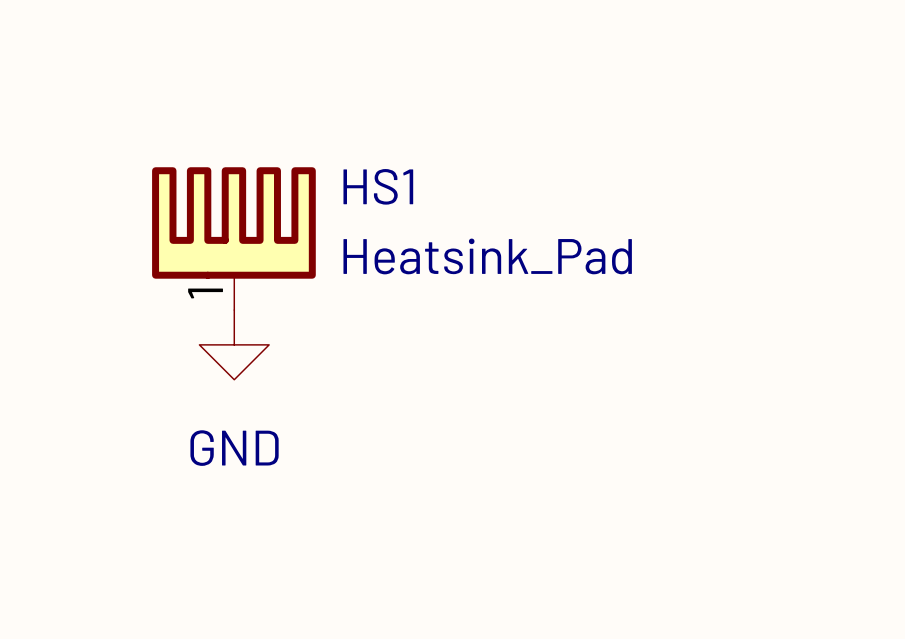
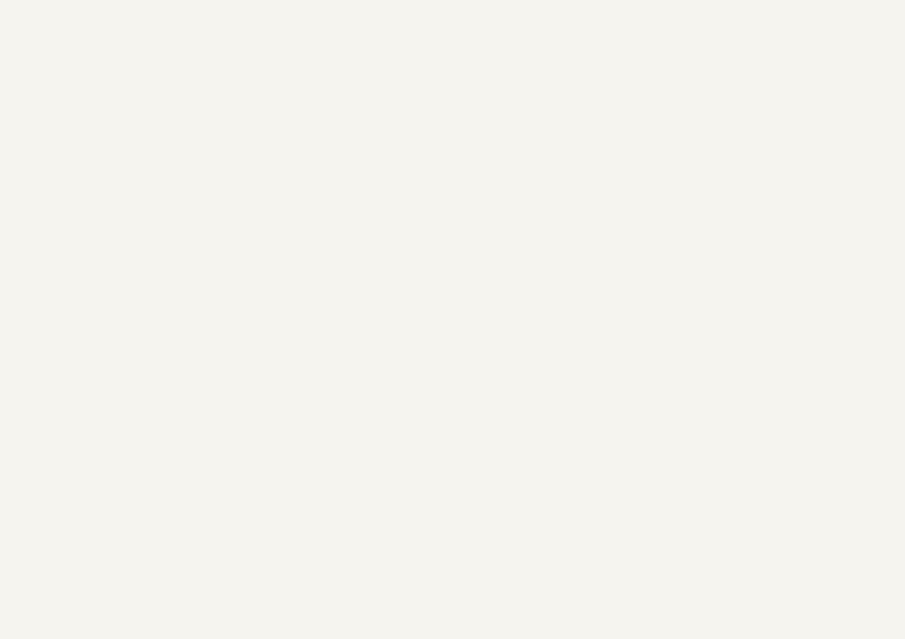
HS1: Heatsink_Pad (233, 238) -> none
power symbol: GND (234, 344) -> none

